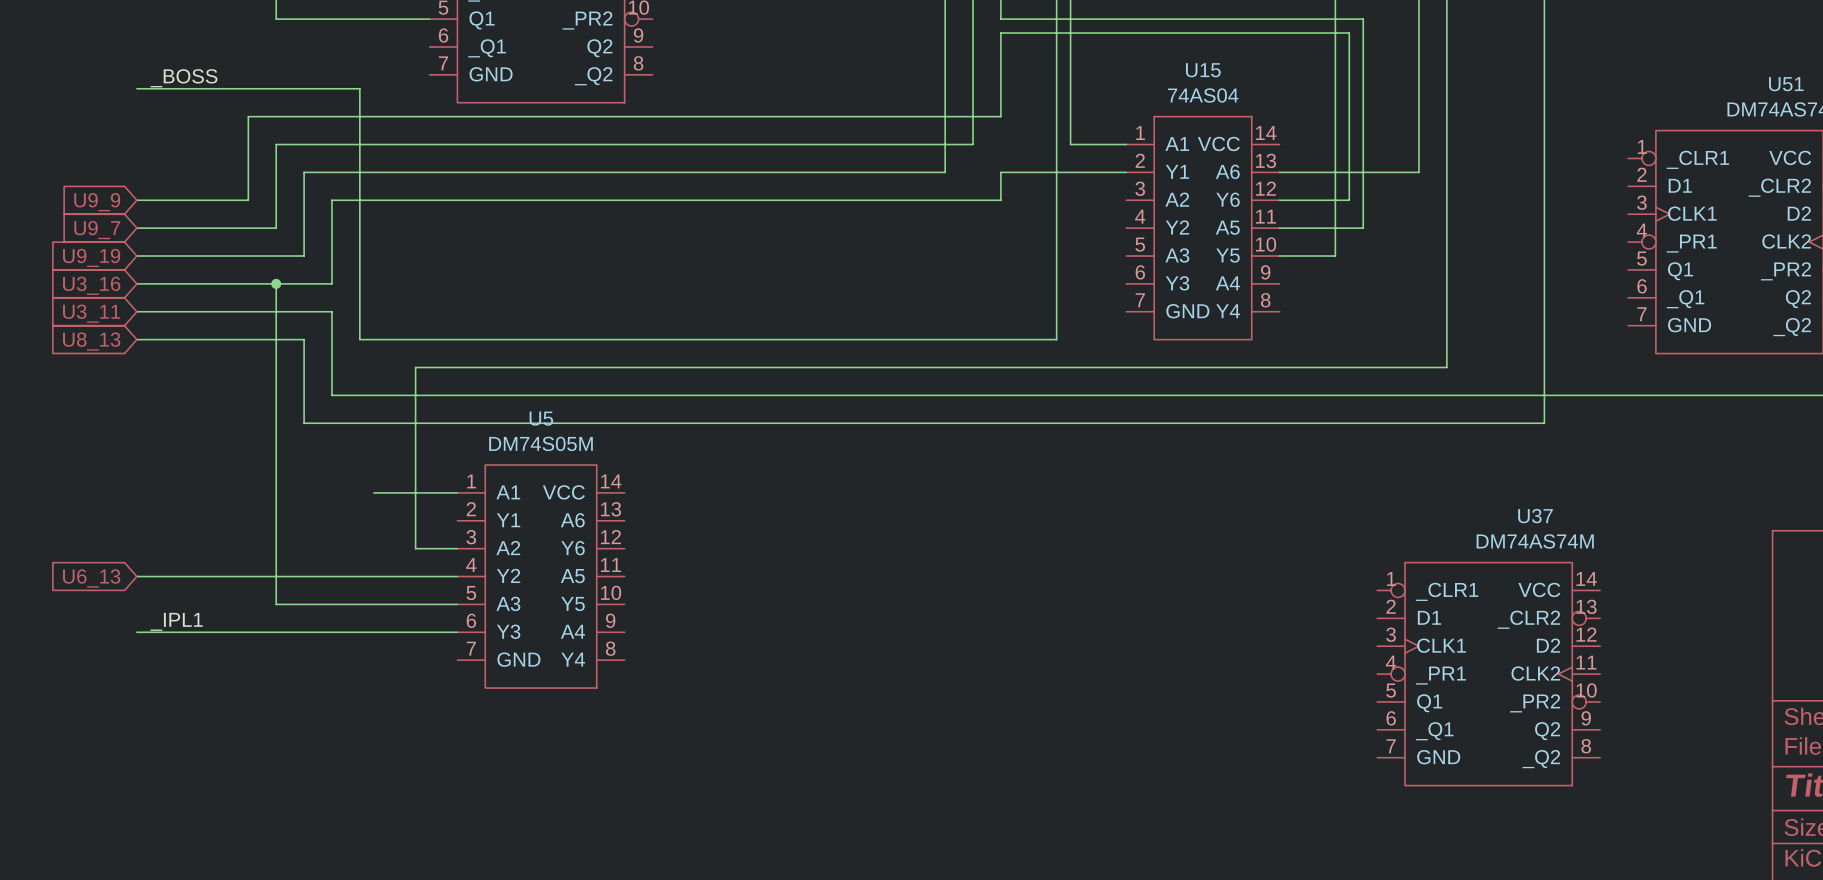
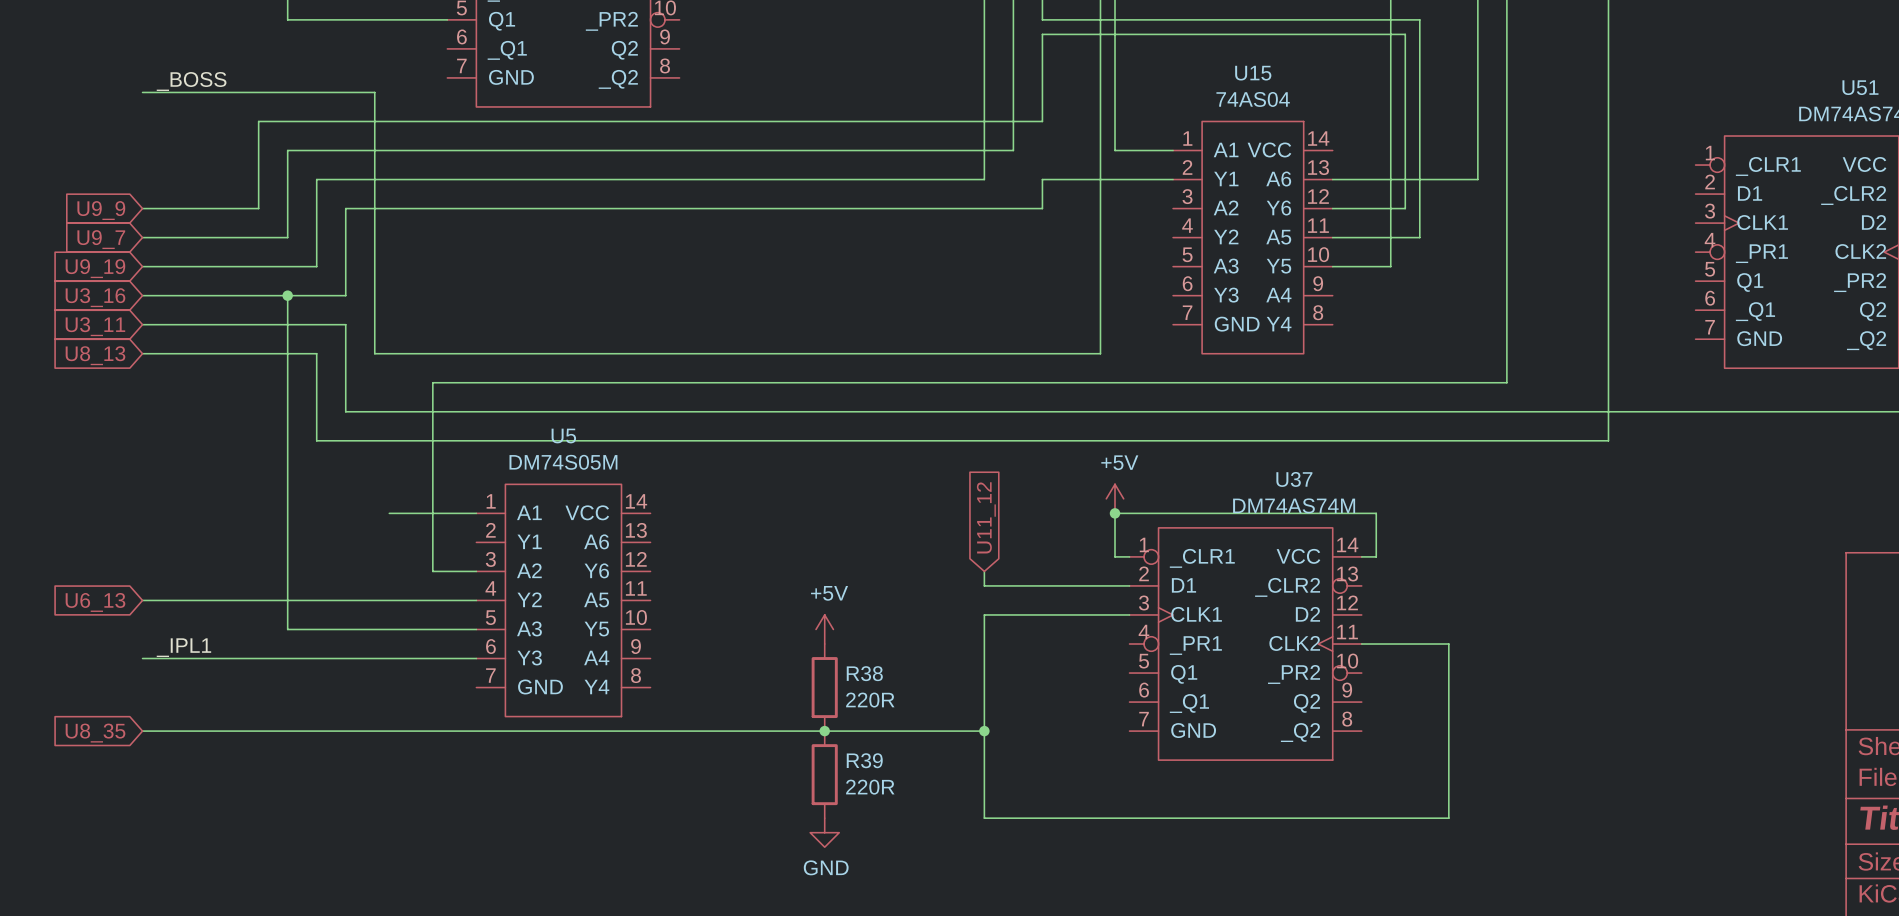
power symbol: none -> +5V (1115, 498)
junction: none -> (1115, 513)
global label: none -> U11_12 (986, 517)
wire: none -> (1129, 556) (1115, 556) (1115, 513) (1376, 513) (1376, 556) (1361, 556)
wire: none -> (984, 571) (984, 585) (1129, 585)
wire: none -> (1129, 614) (984, 614) (984, 818) (1448, 818) (1448, 644) (1361, 644)
power symbol: none -> +5V (824, 629)
R38: none -> 220R (824, 687)
U37 position: (1537, 674) -> (1296, 644)
wire: none -> (142, 731) (984, 731)
junction: none -> (824, 731)
junction: none -> (984, 731)
global label: none -> U8_35 (95, 733)
R39: none -> 220R (824, 774)
power symbol: none -> GND (824, 832)

